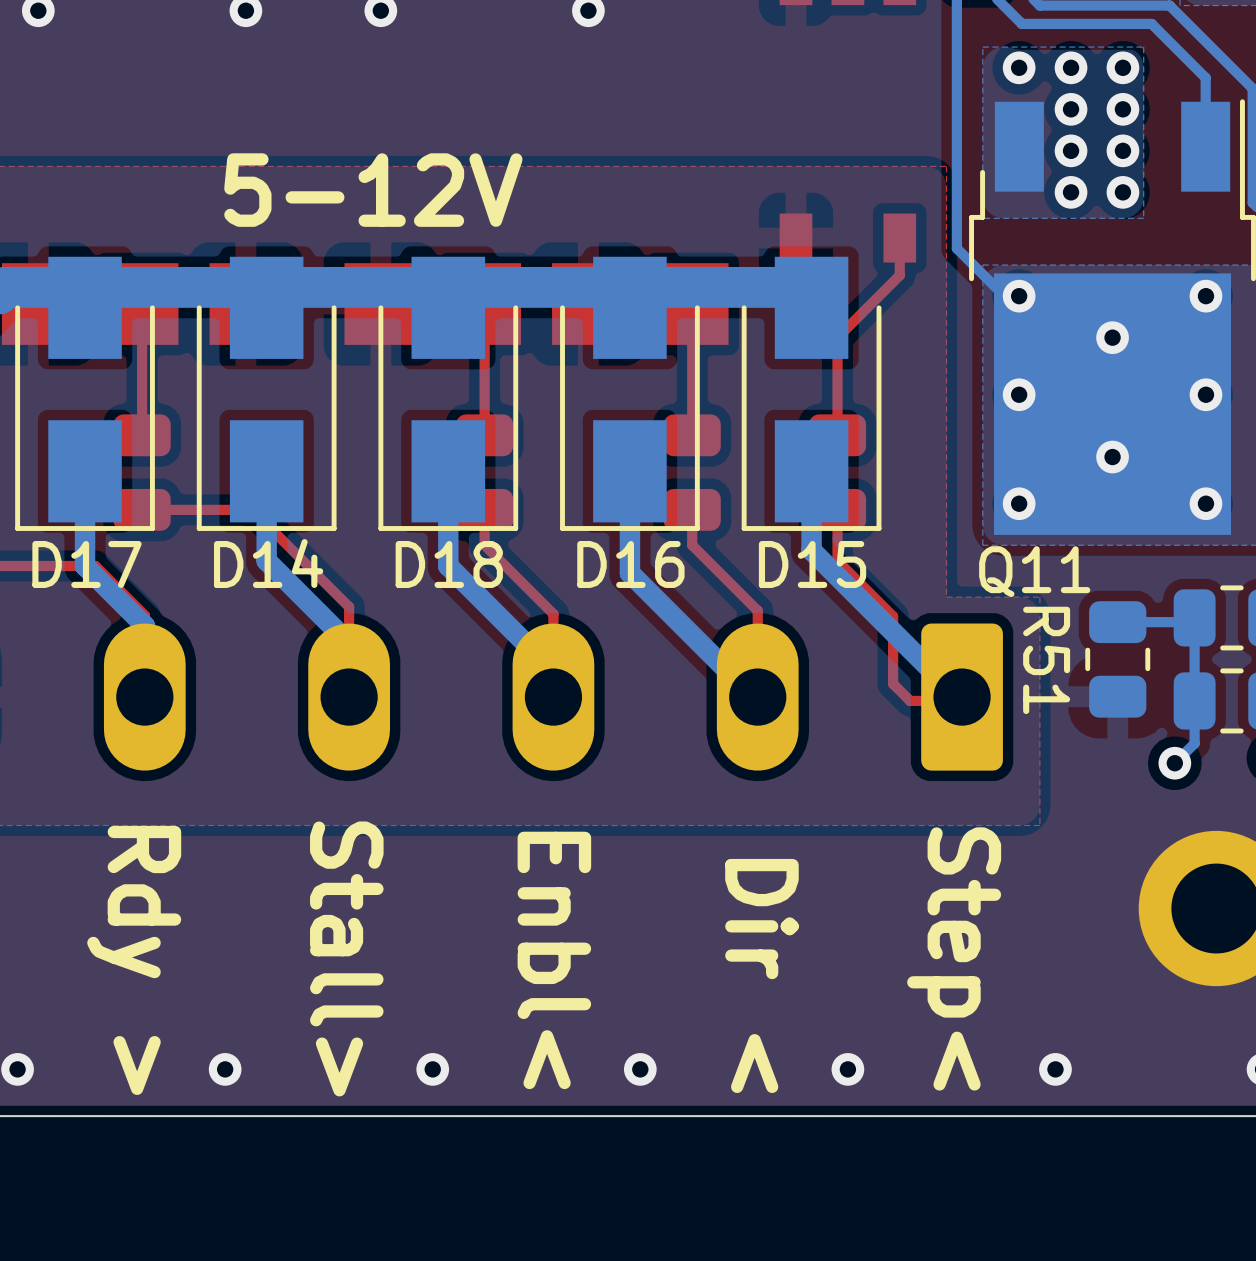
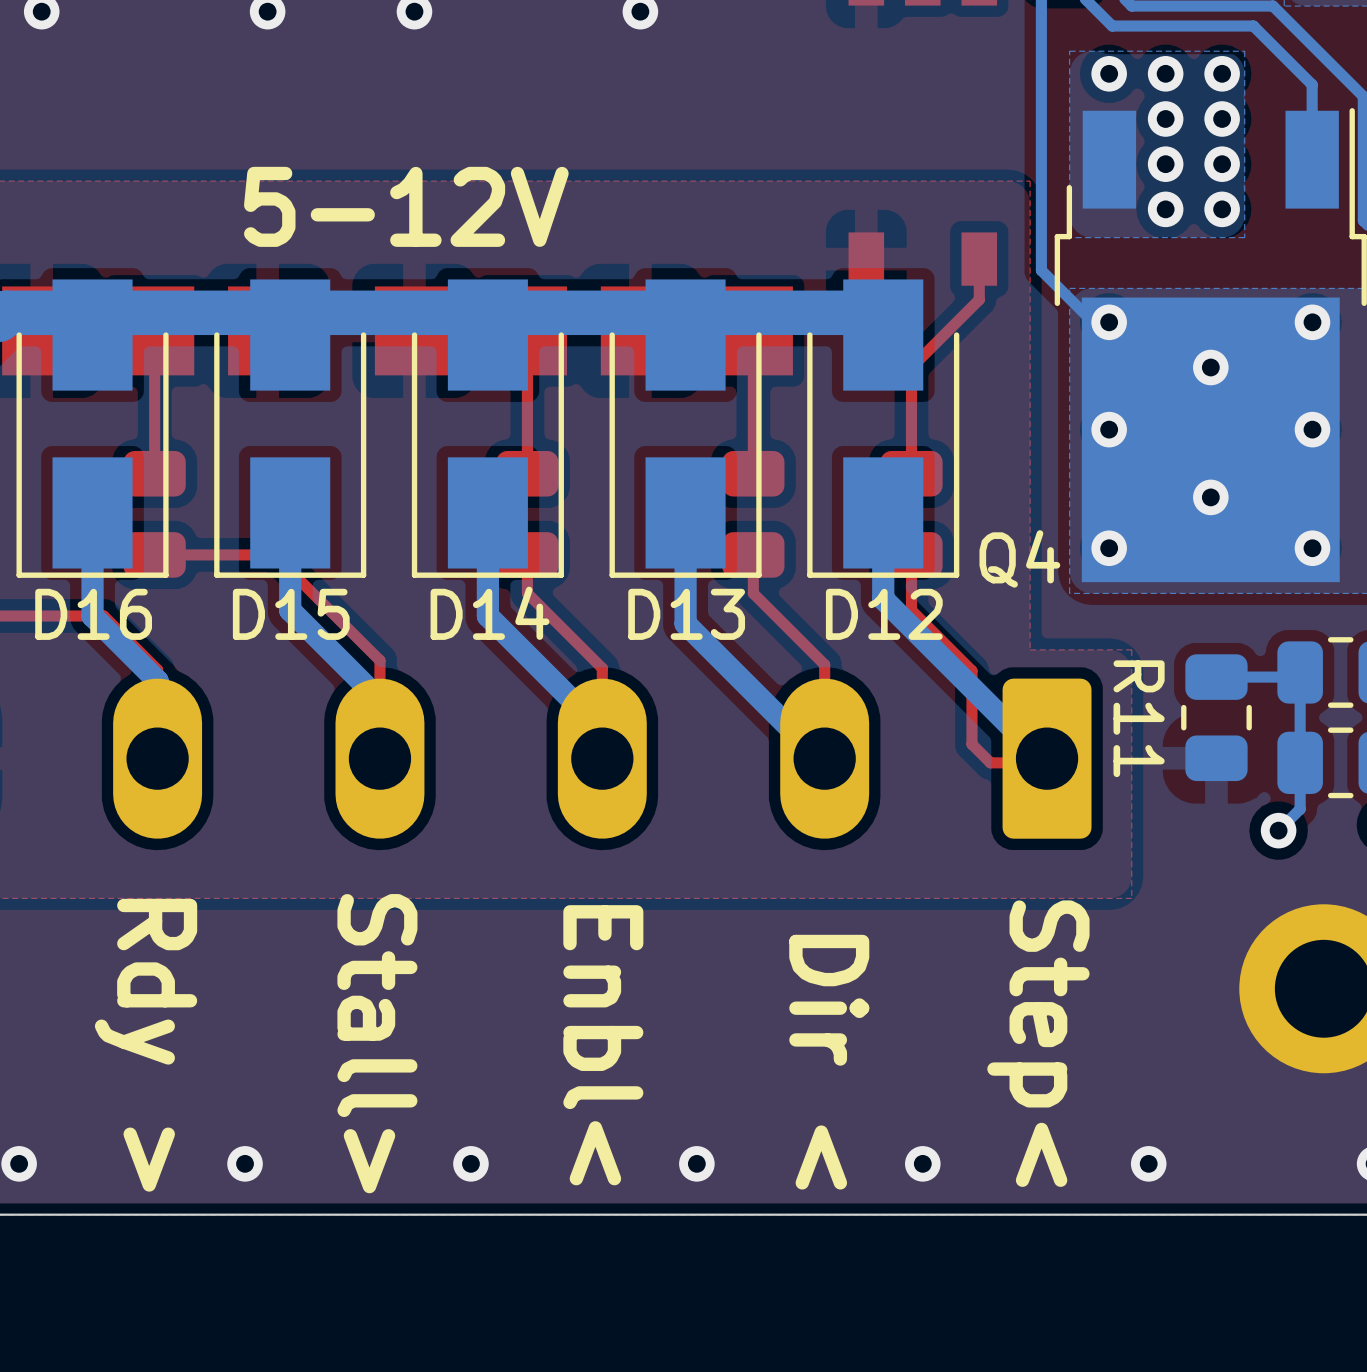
D14 name: D14 (268, 563) -> D15 (291, 614)
D17 name: D17 (86, 564) -> D16 (93, 614)
D18 name: D18 (449, 564) -> D14 (490, 613)
D16 name: D16 (630, 564) -> D13 (686, 614)
D15 name: D15 (812, 564) -> D12 (884, 614)
Q11 name: Q11 (1034, 571) -> Q4 (1019, 558)
R51 name: R51 (1046, 660) -> R11 (1139, 718)

